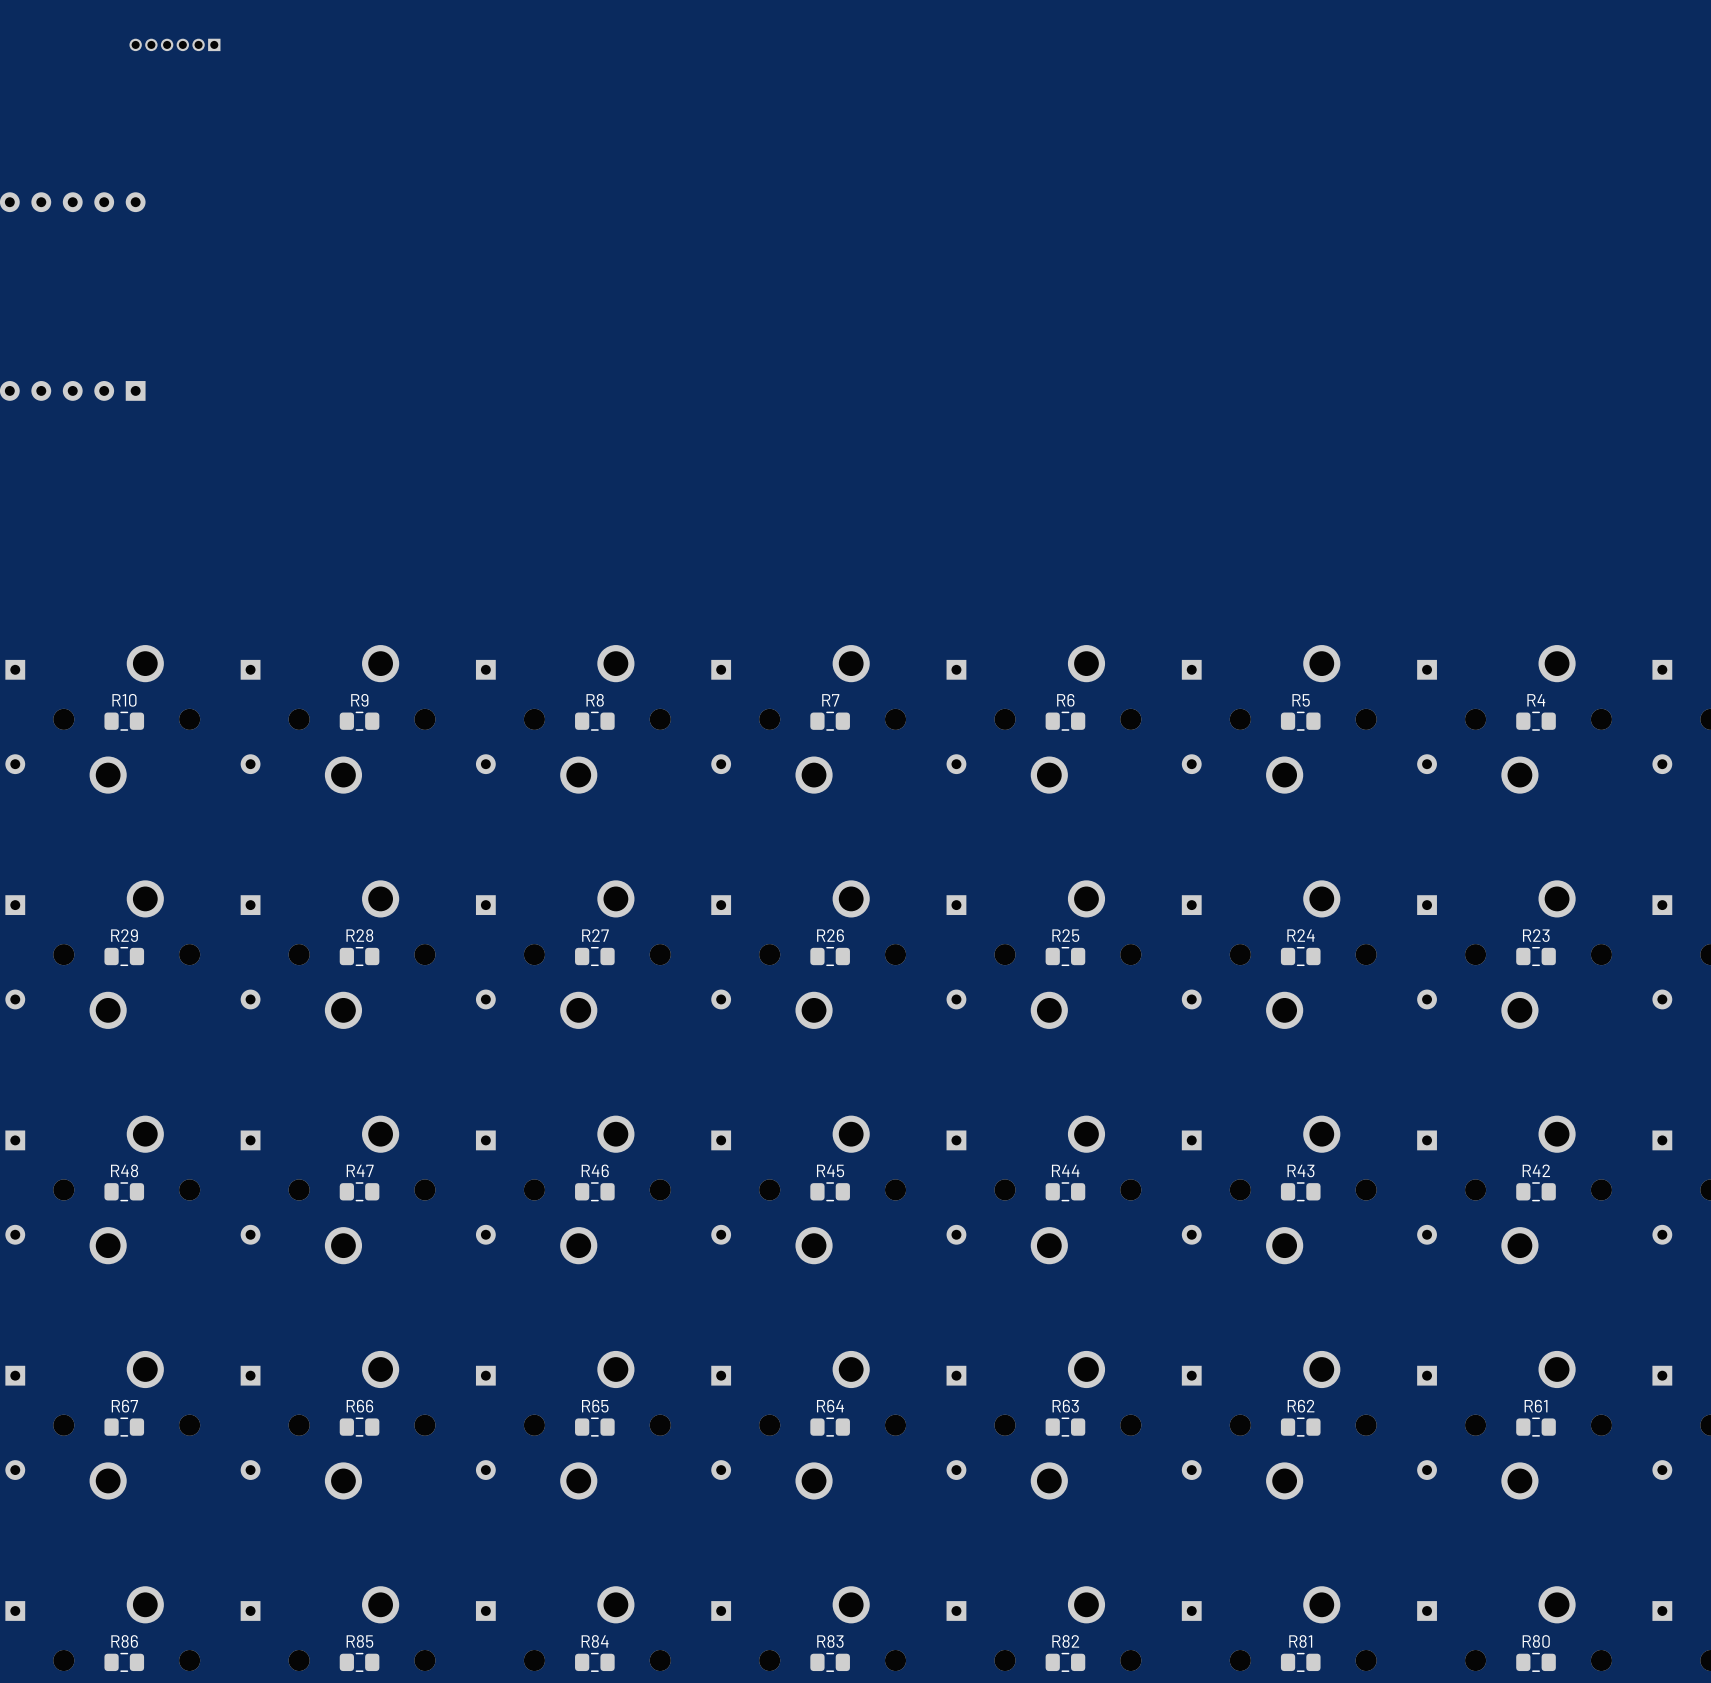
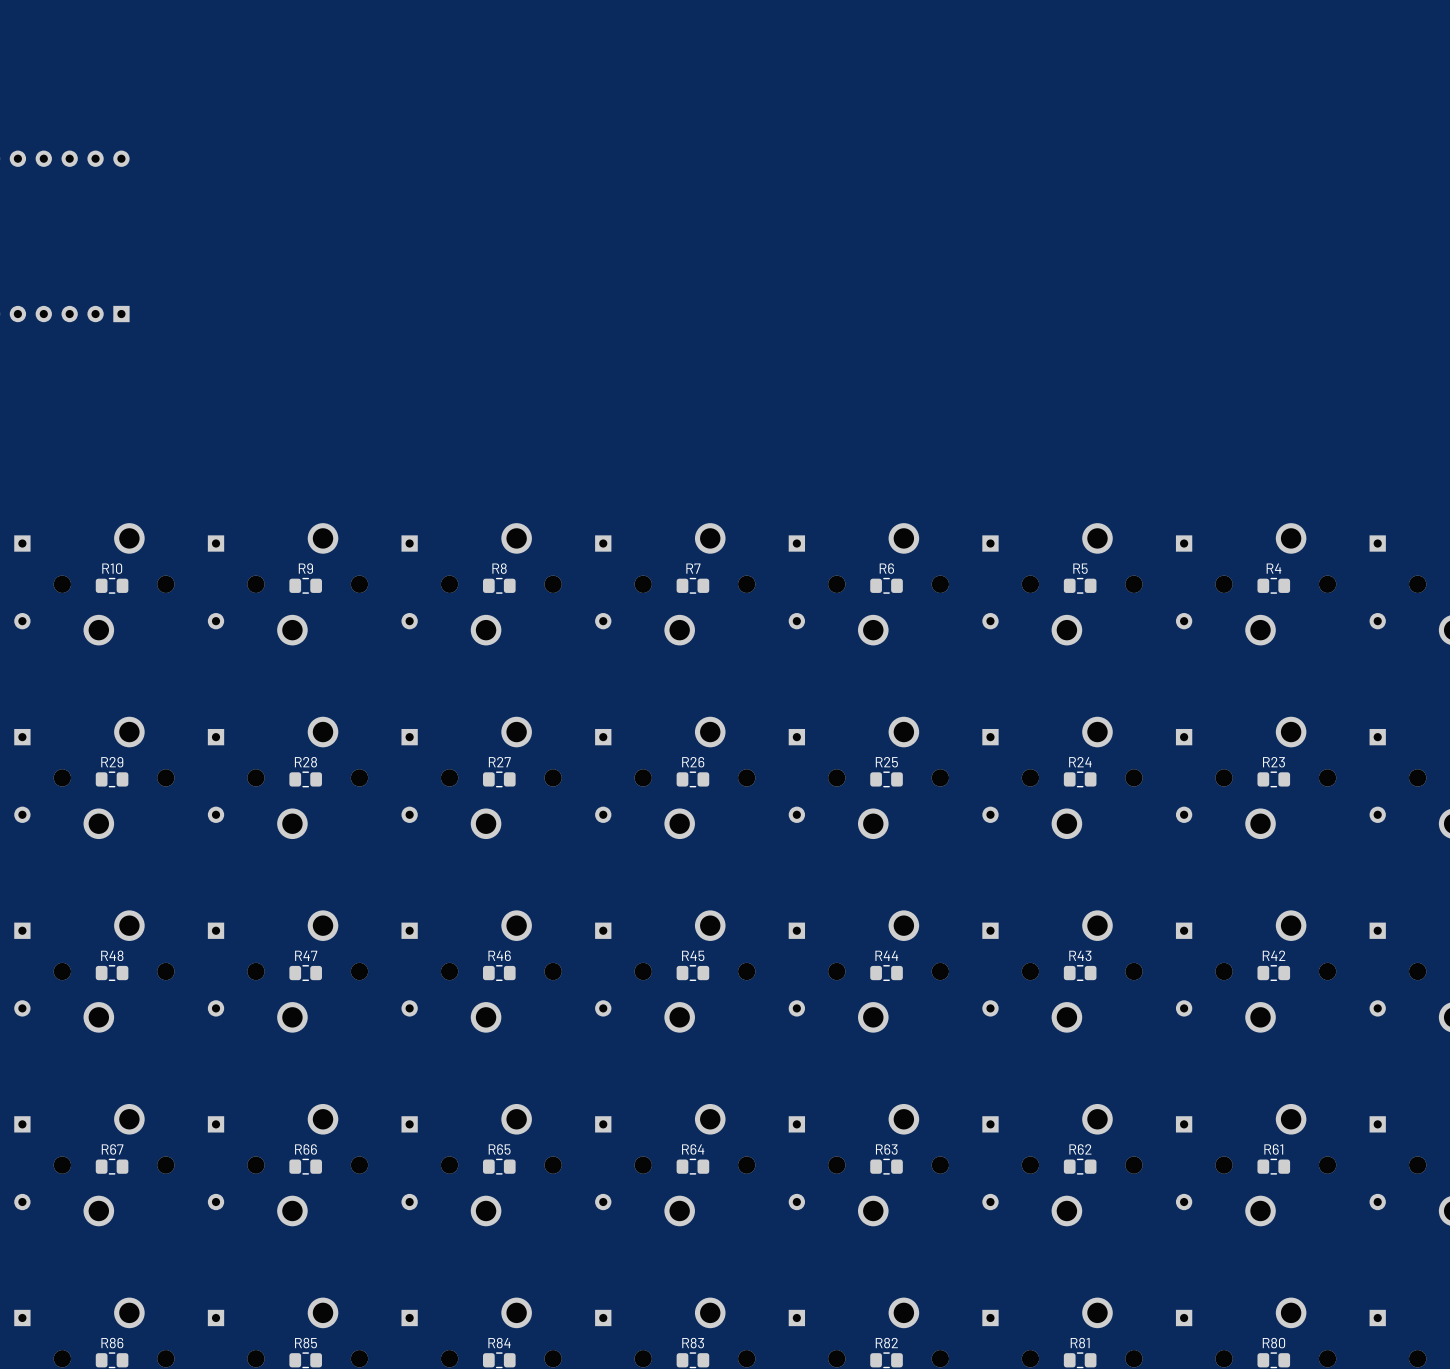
part: (174, 44) -> none

